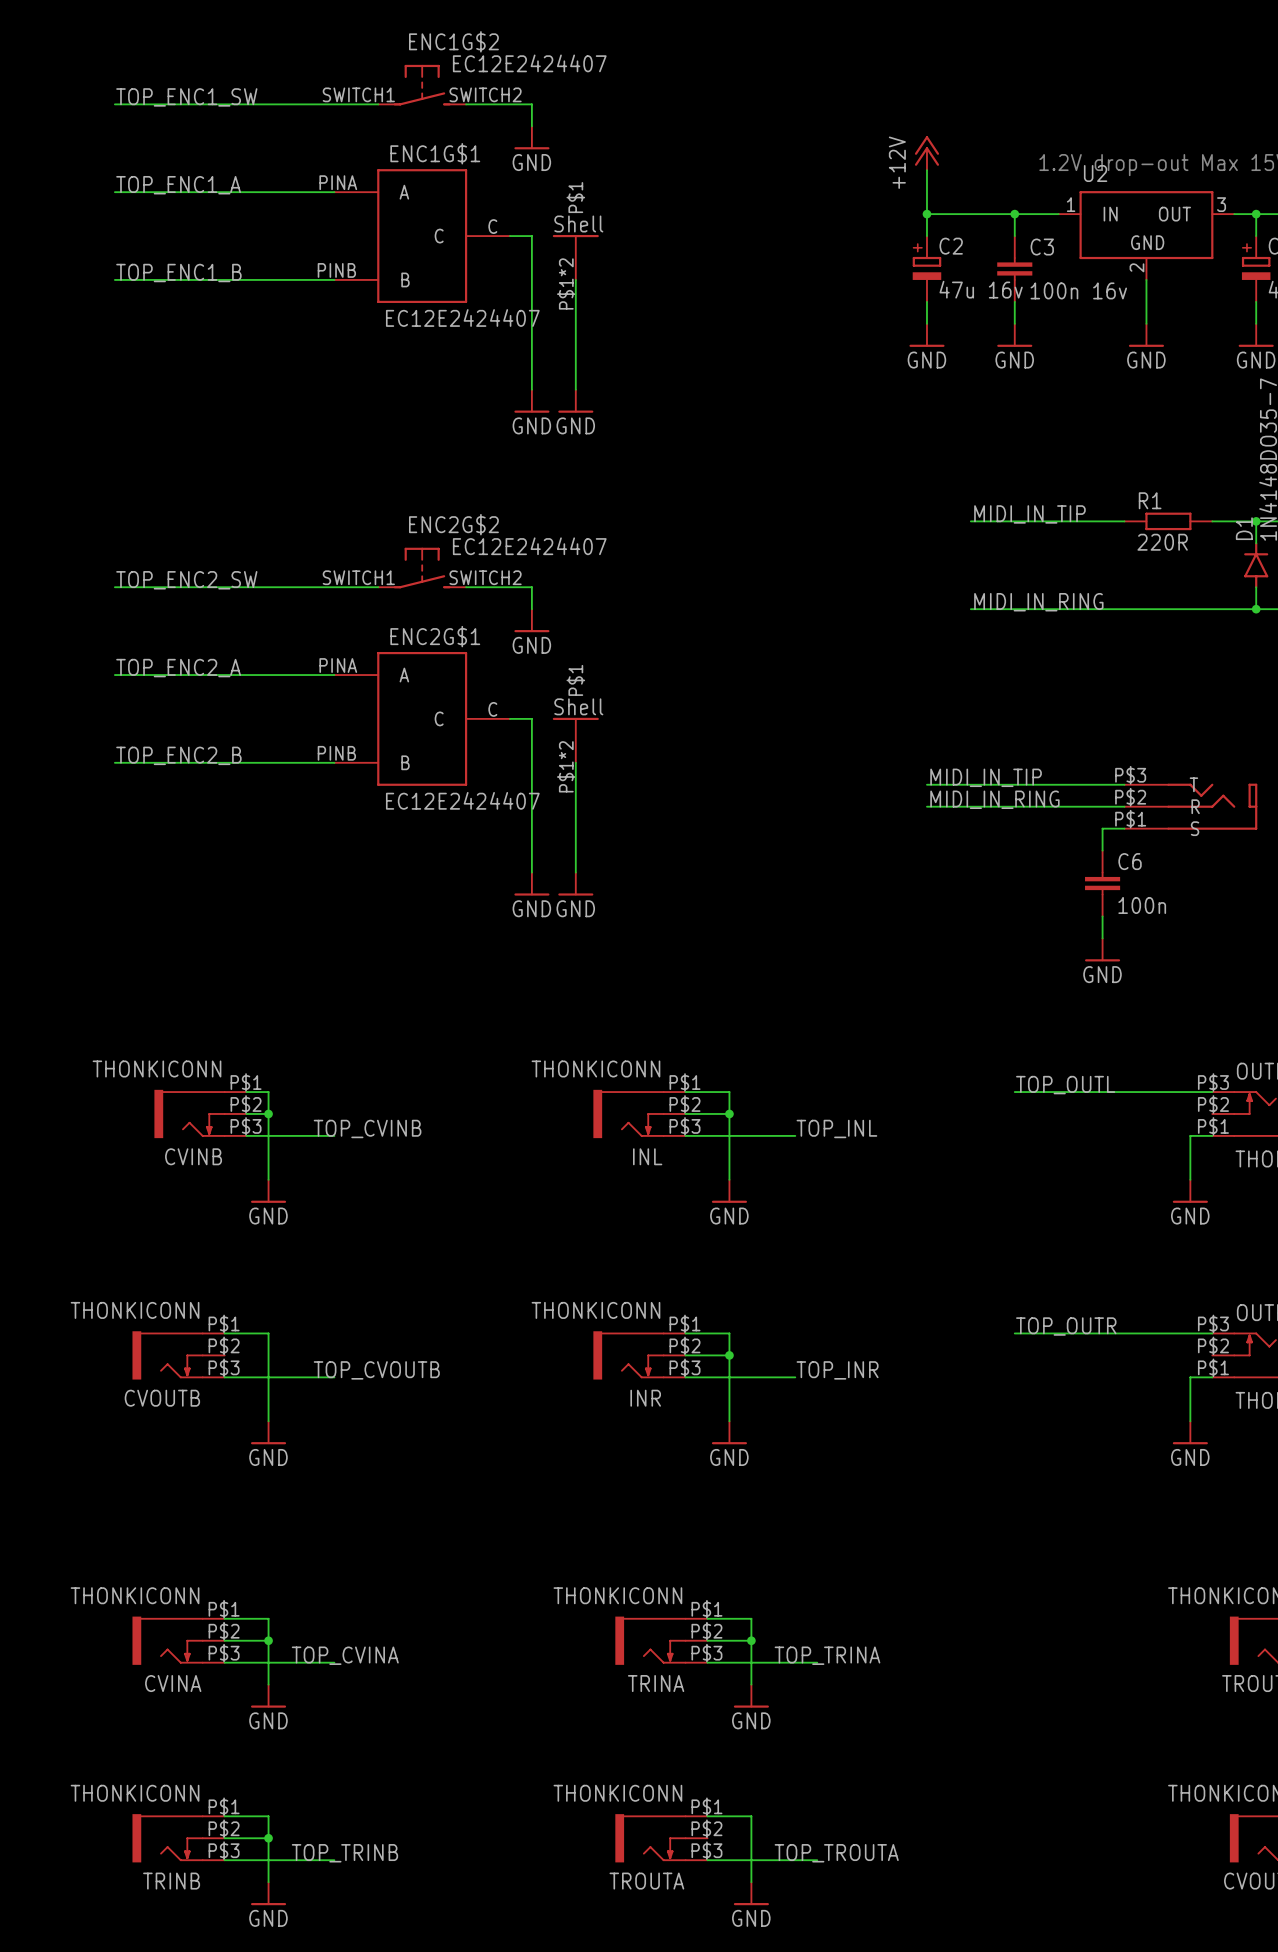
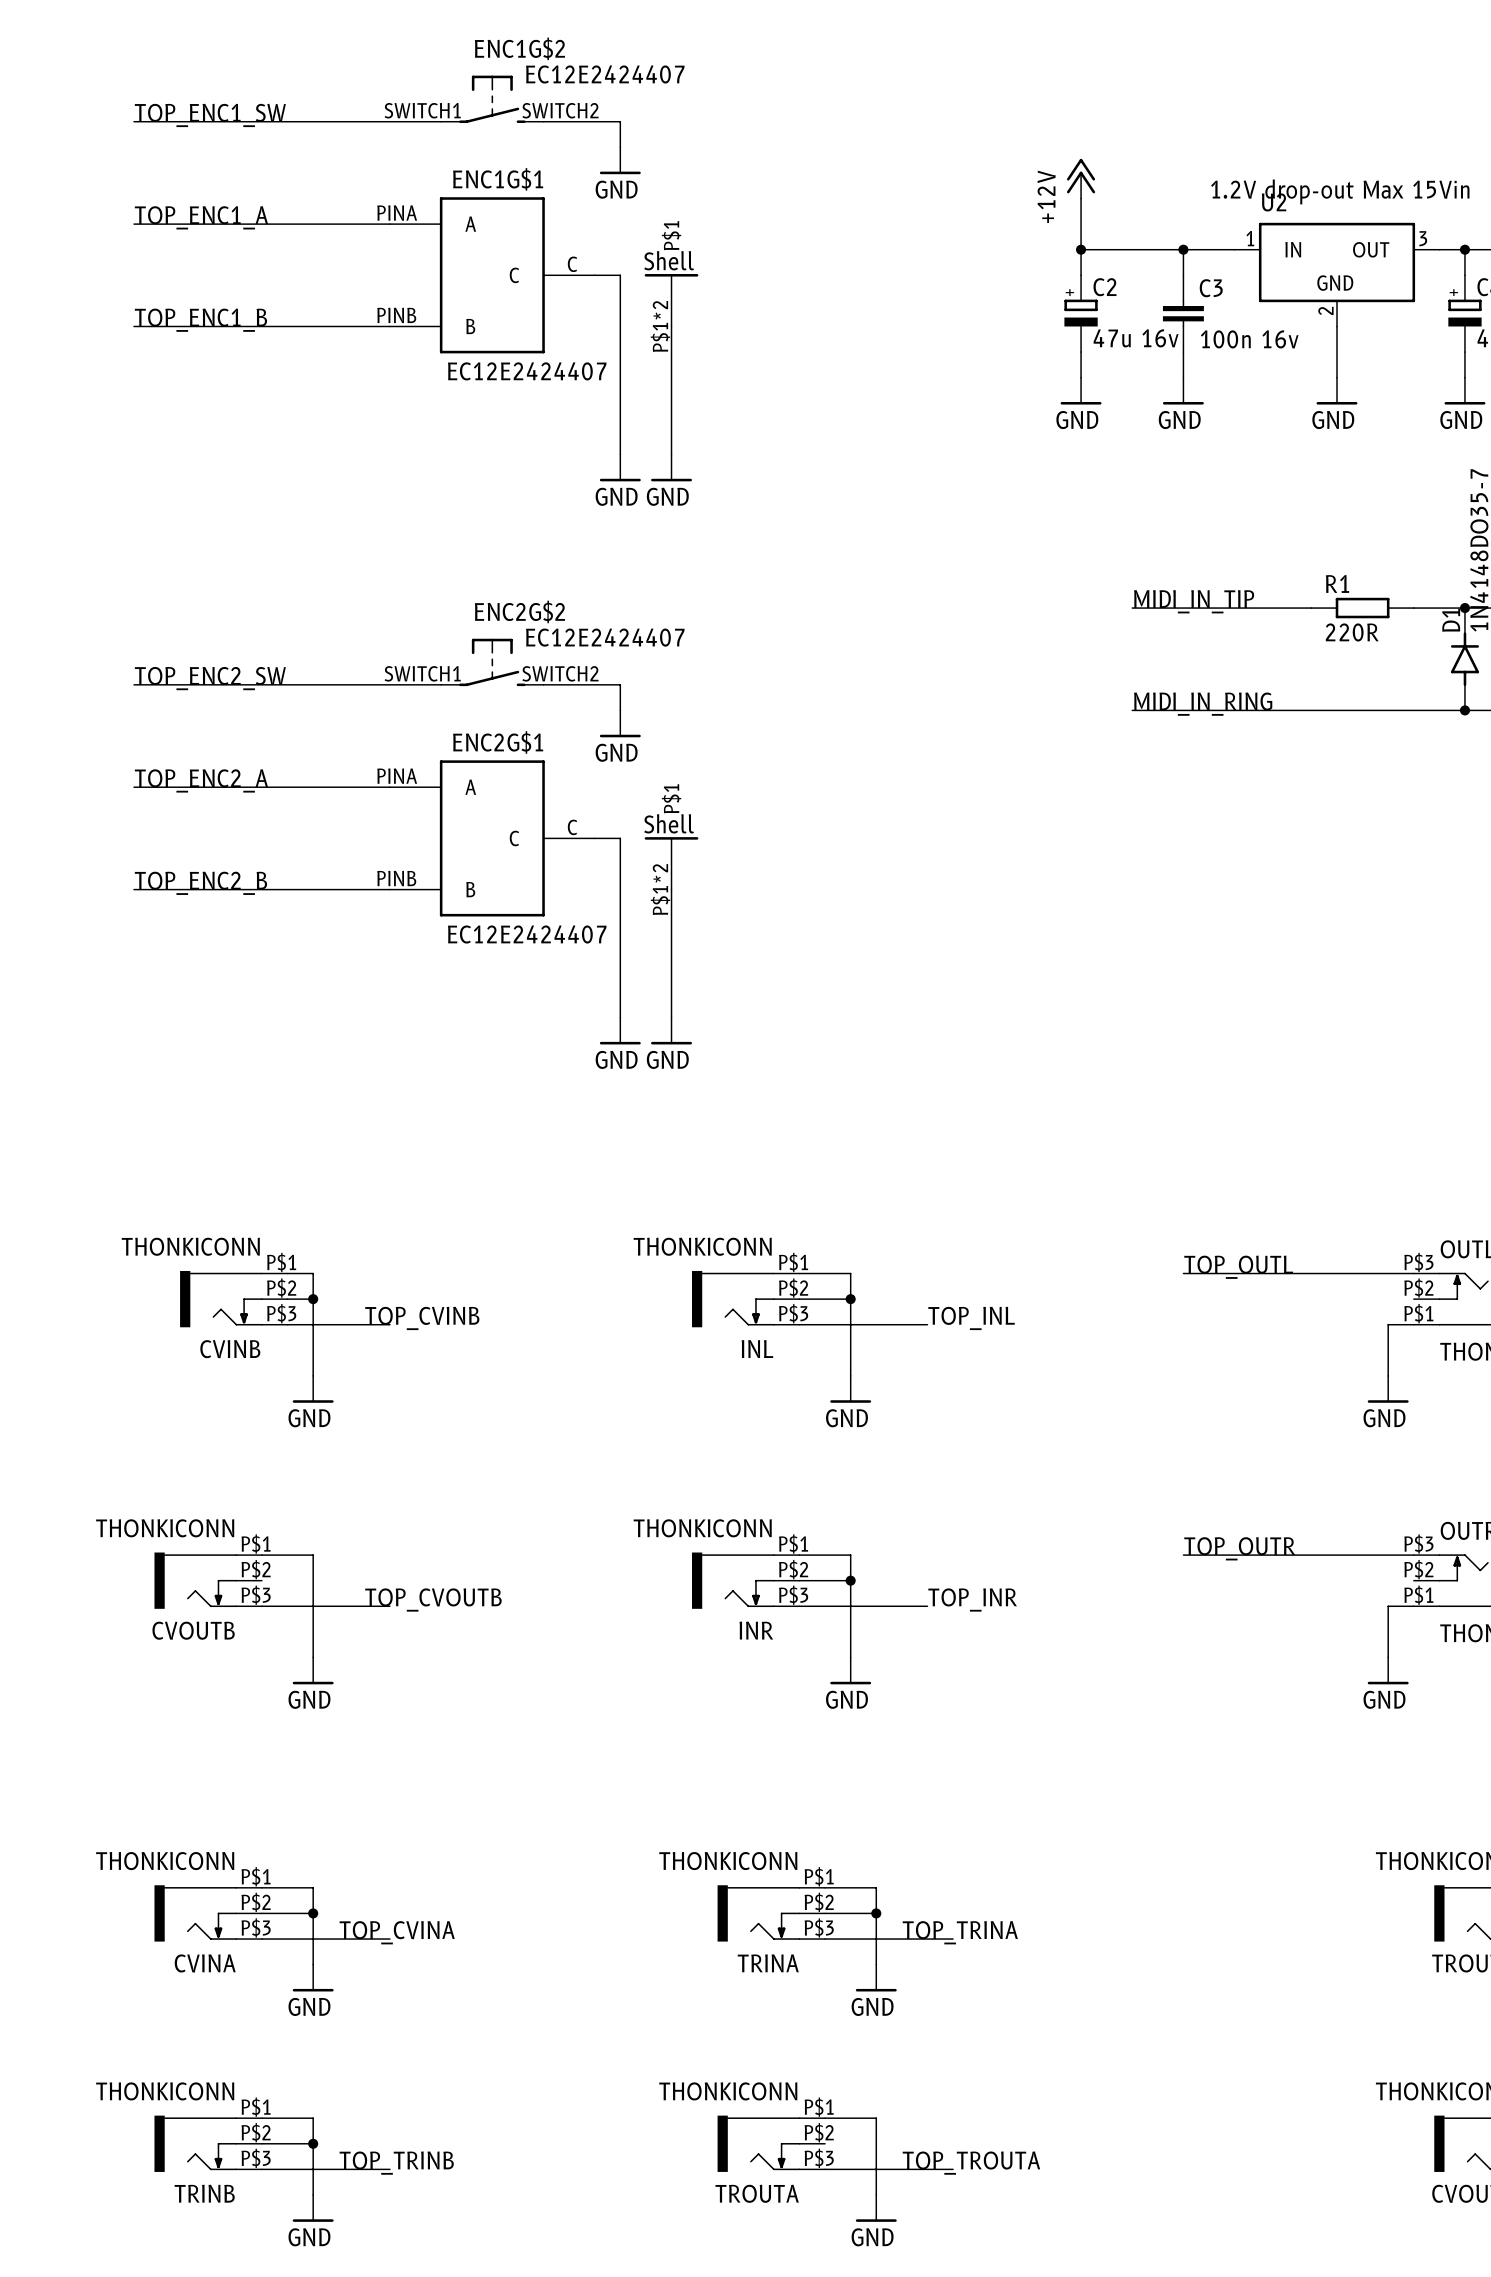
label: MIDI_IN_TIP (986, 777) -> none
wire: (926, 784) (1124, 784) -> none
label: MIDI_IN_RING (994, 799) -> none
wire: (926, 806) (1124, 806) -> none
part: (1190, 806) -> none
wire: (1124, 828) (1102, 828) (1102, 850) -> none
C6: 100n (1102, 883) -> none
wire: (1102, 916) (1102, 938) -> none
power symbol: GND (1102, 949) -> none

